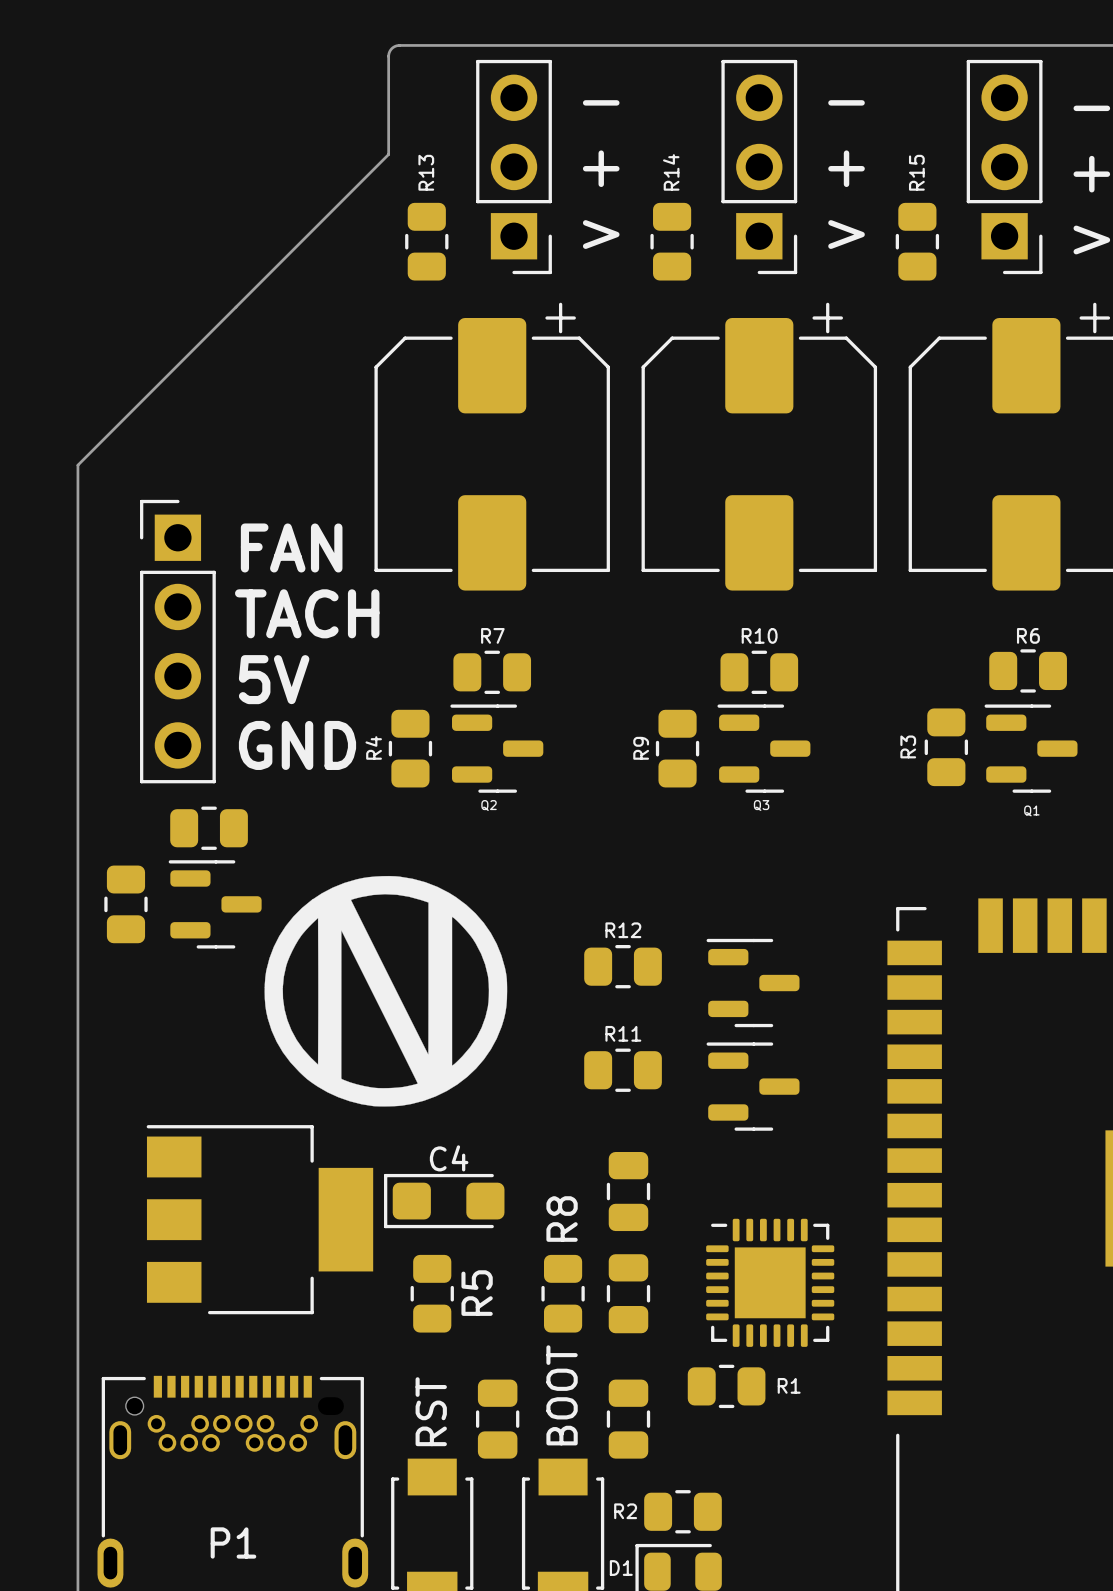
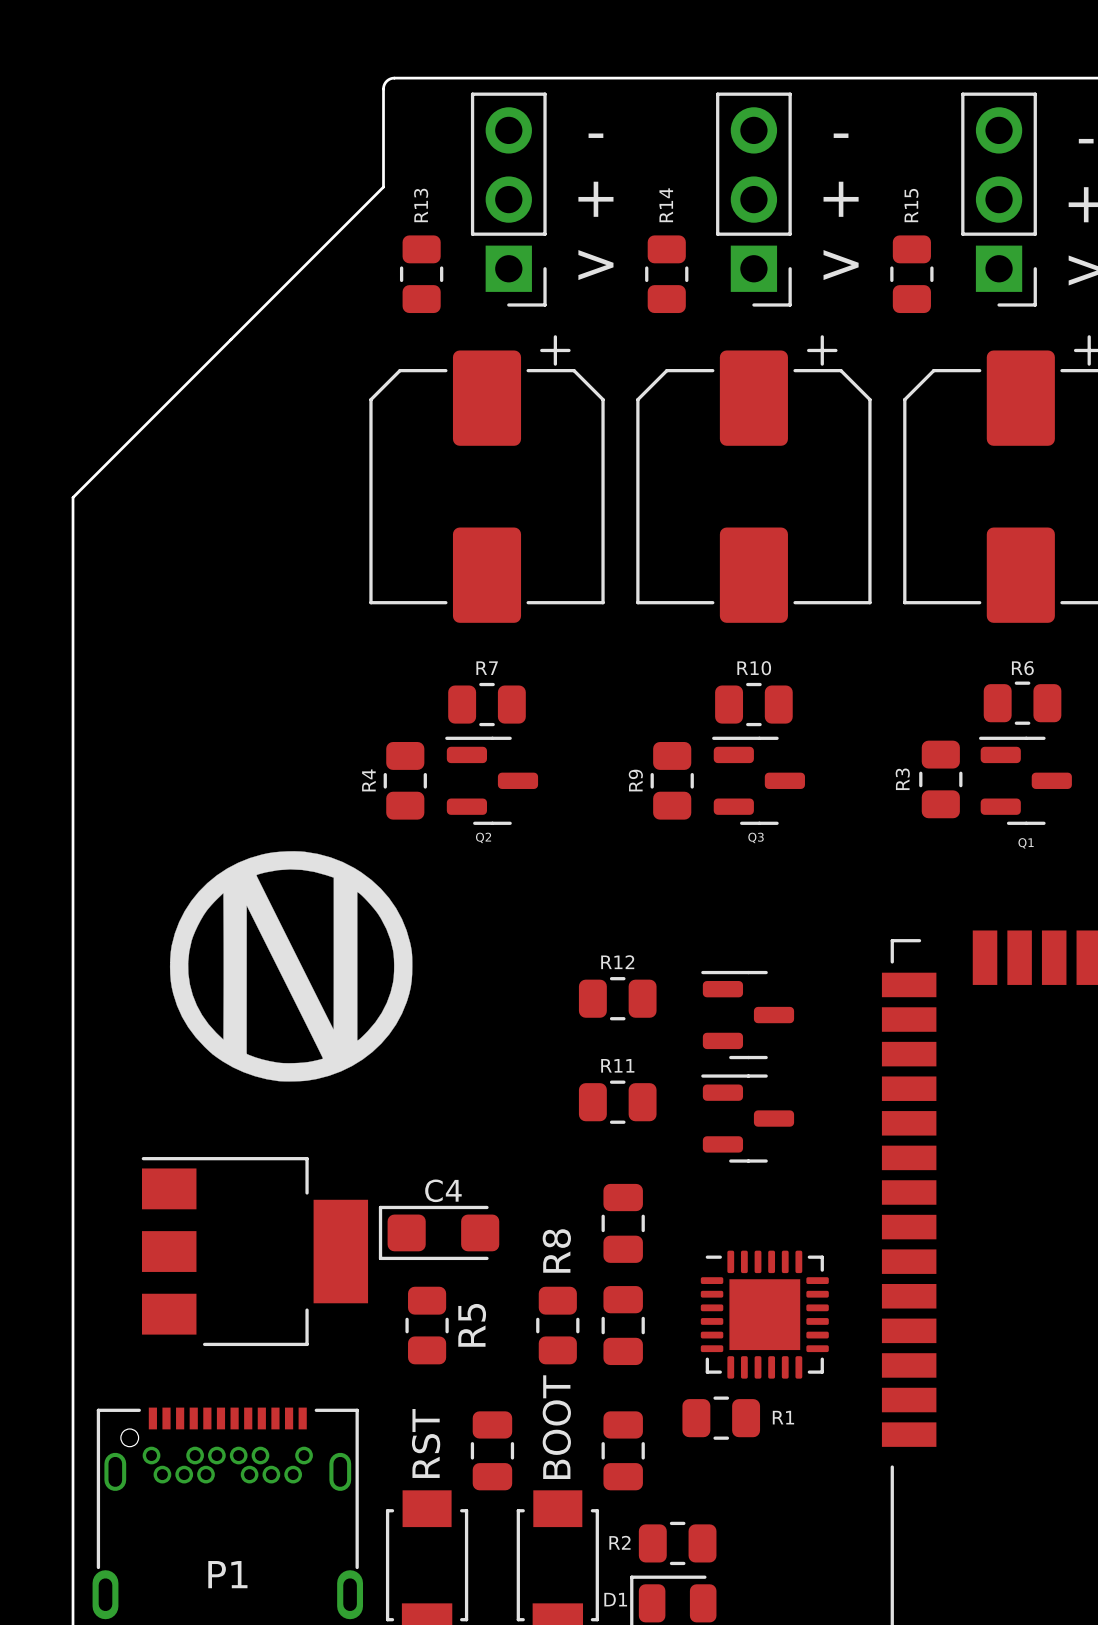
text: FAN (291, 547) -> none
text: TACH (307, 613) -> none
part: (177, 641) -> none
text: 5V (274, 679) -> none
text: GND (297, 745) -> none
part: (209, 828) -> none
part: (125, 904) -> none
part: (215, 904) -> none
drawing position: (385, 991) -> (291, 966)

